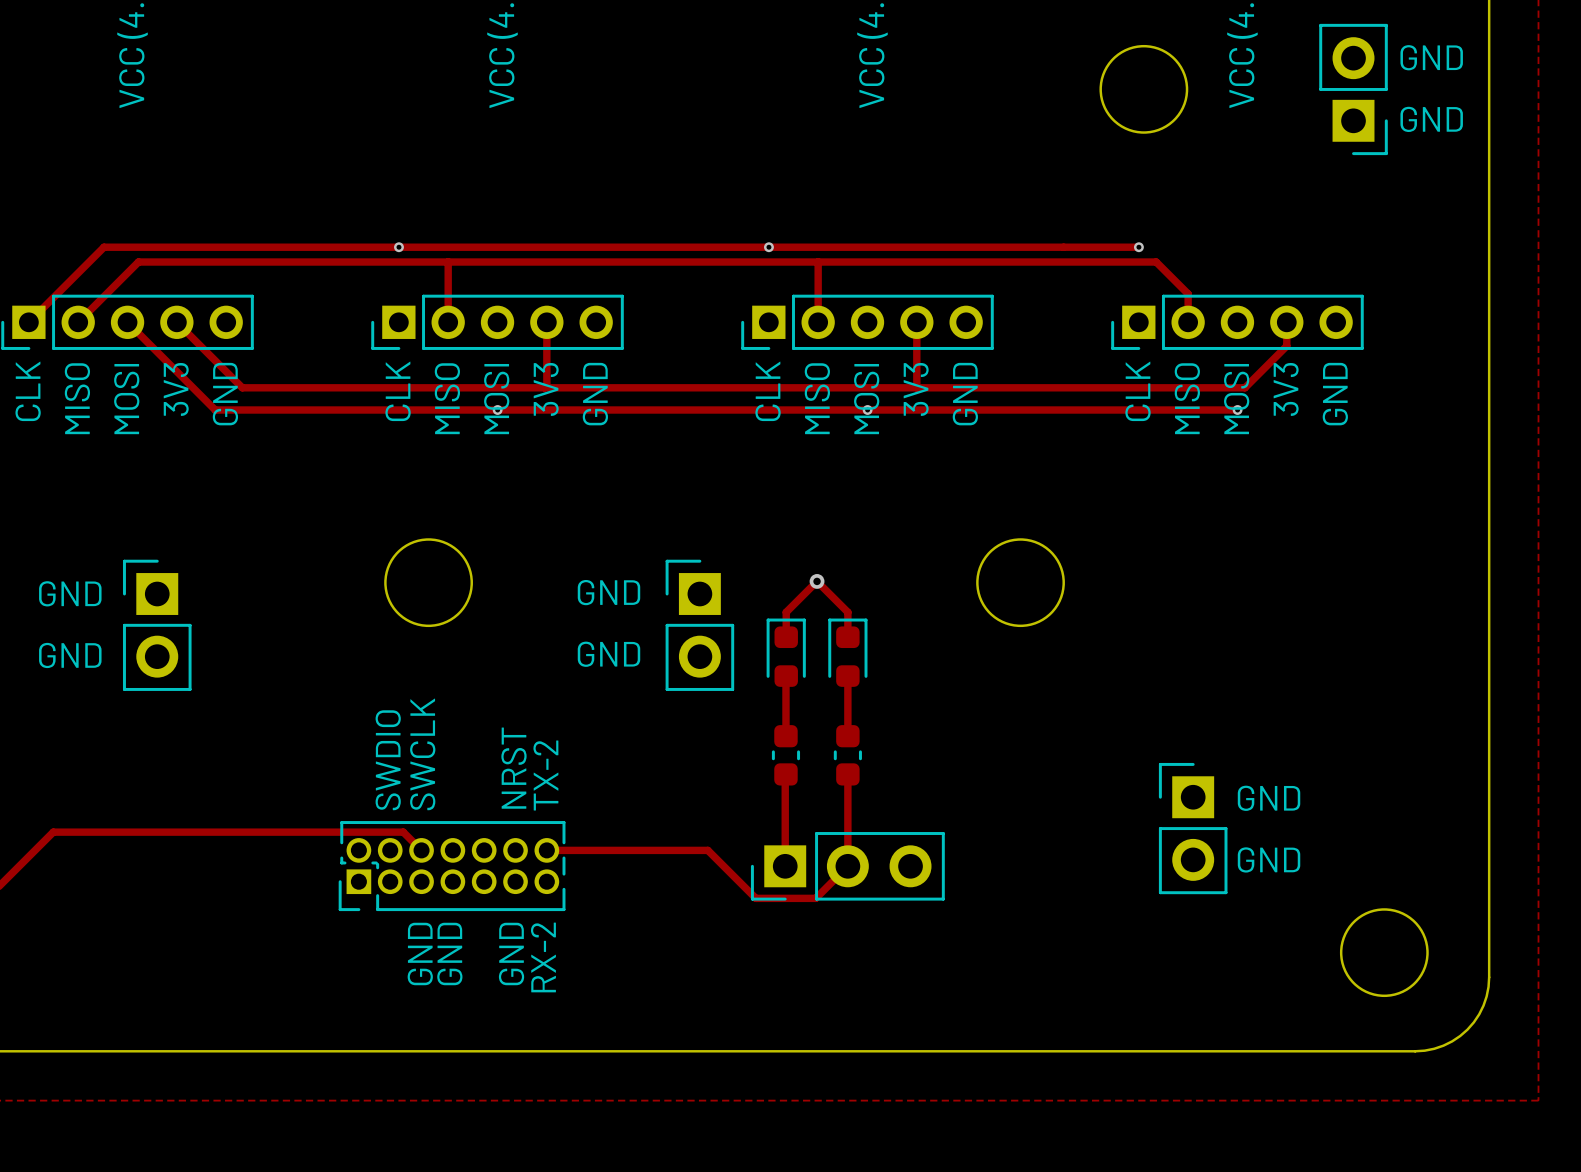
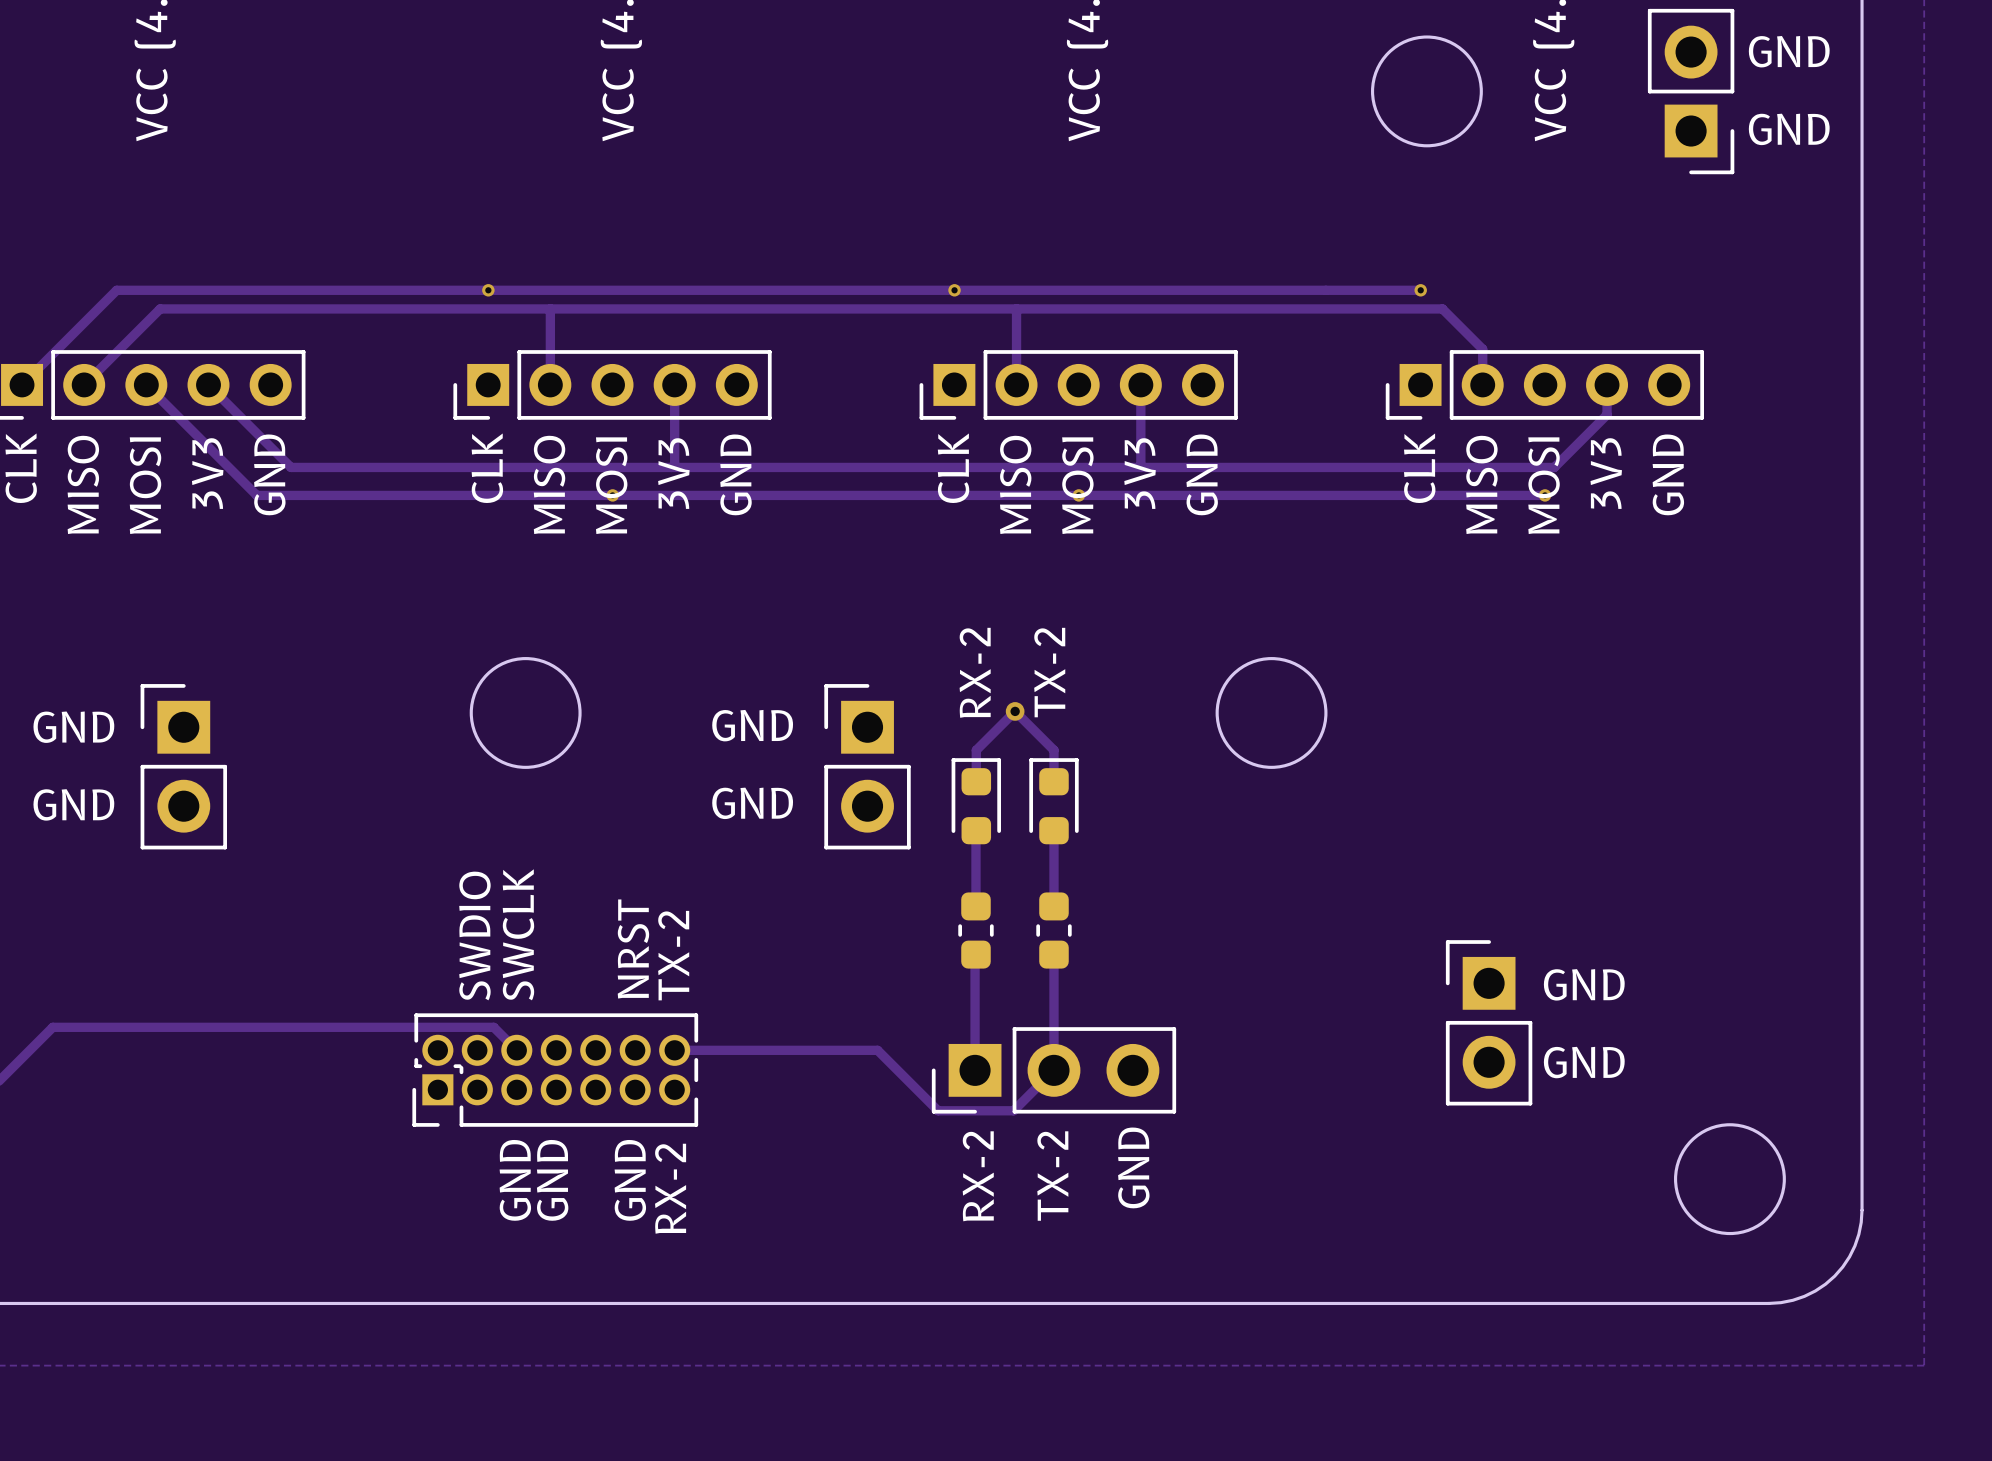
text: none -> RX-2 (975, 672)
text: none -> TX-2 (1049, 672)
text: none -> GND (1133, 1167)
text: none -> RX-2 (978, 1176)
text: none -> TX-2 (1052, 1176)

